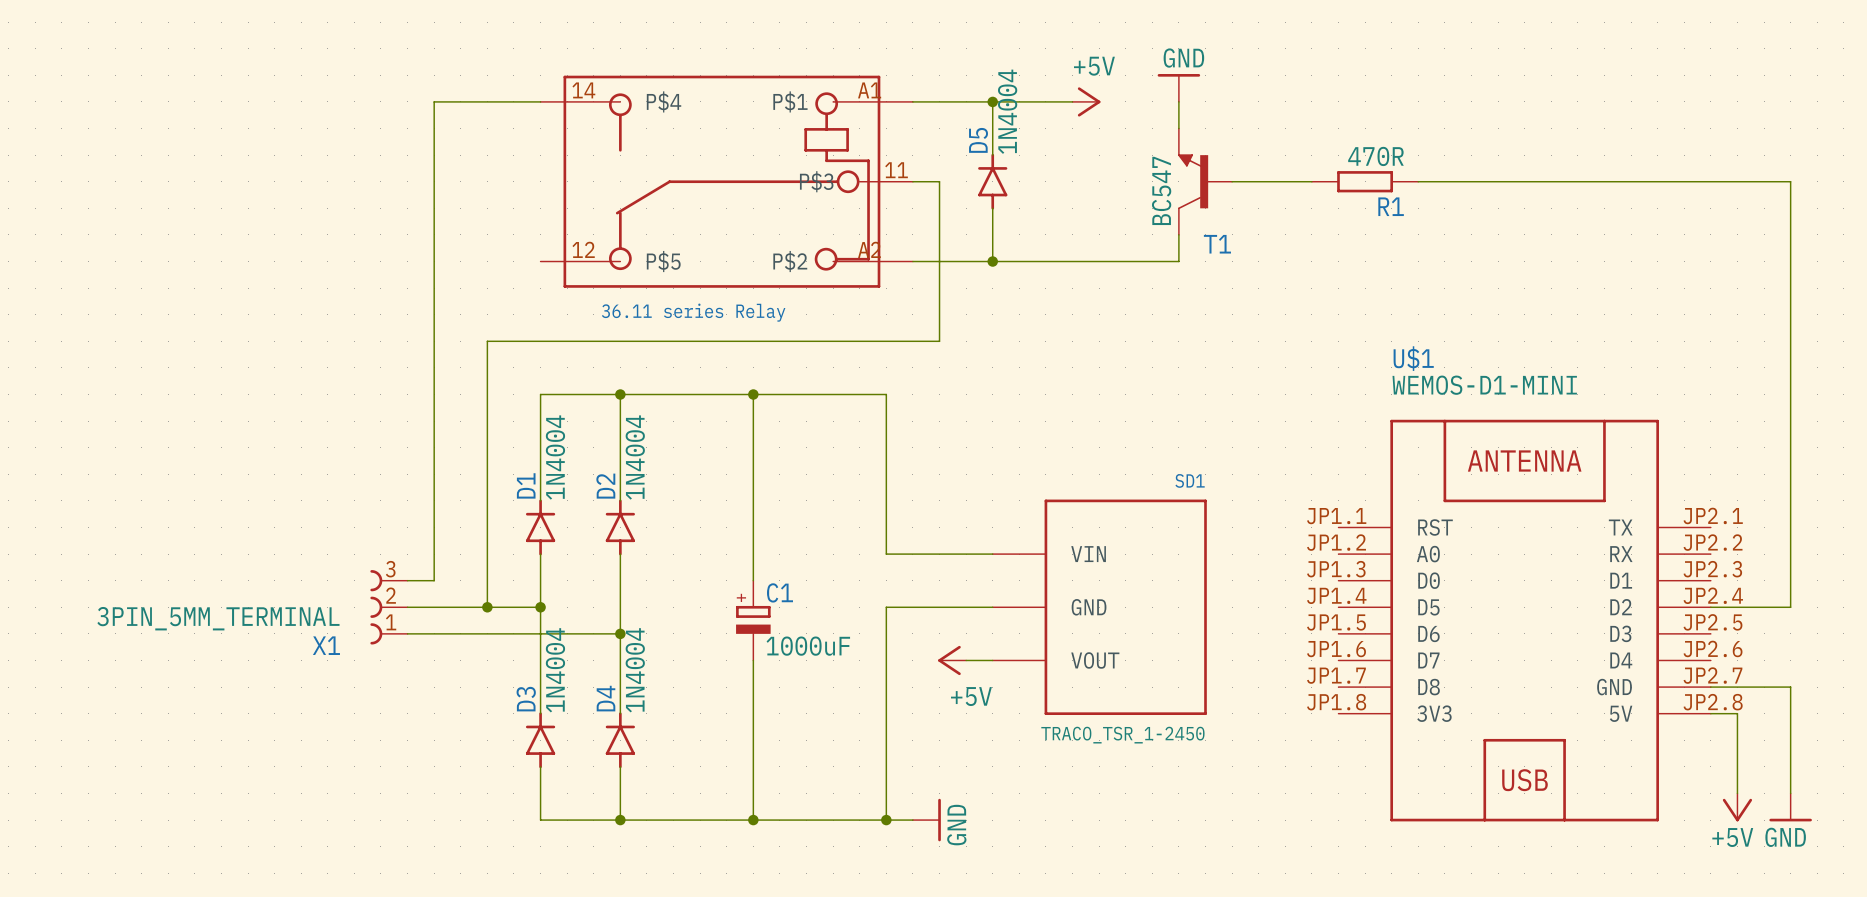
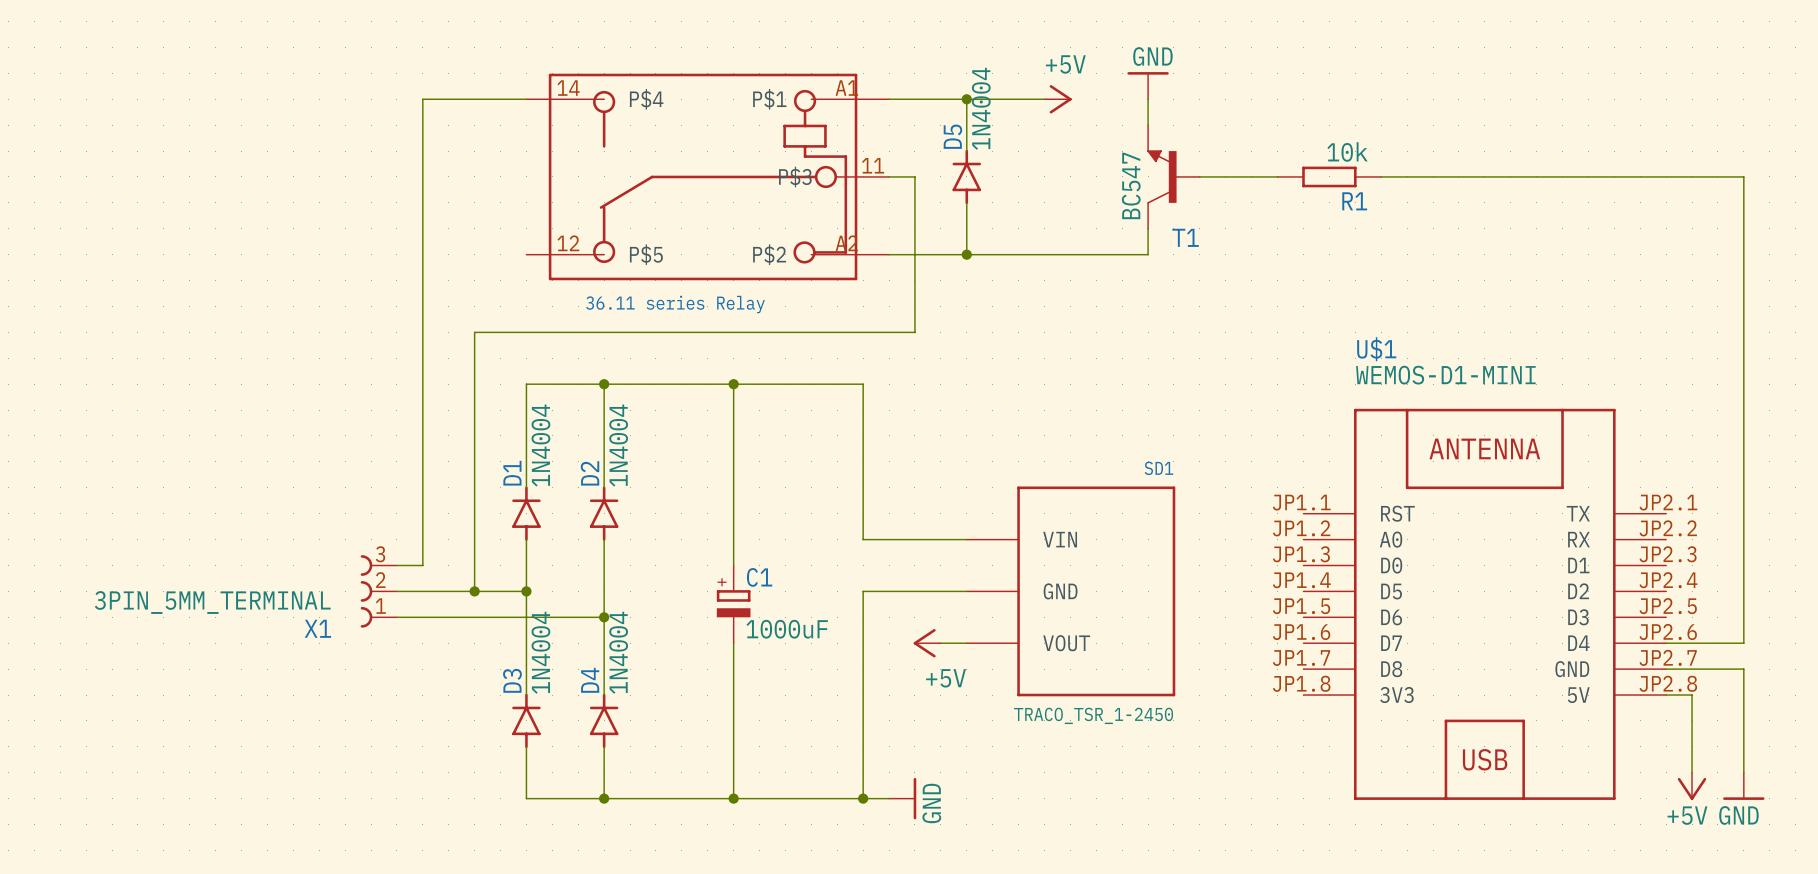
R1 value: 470R (1375, 156) -> 10k (1347, 151)
wire: (1710, 607) (1790, 607) -> (1666, 643) (1743, 643) (1743, 591)

